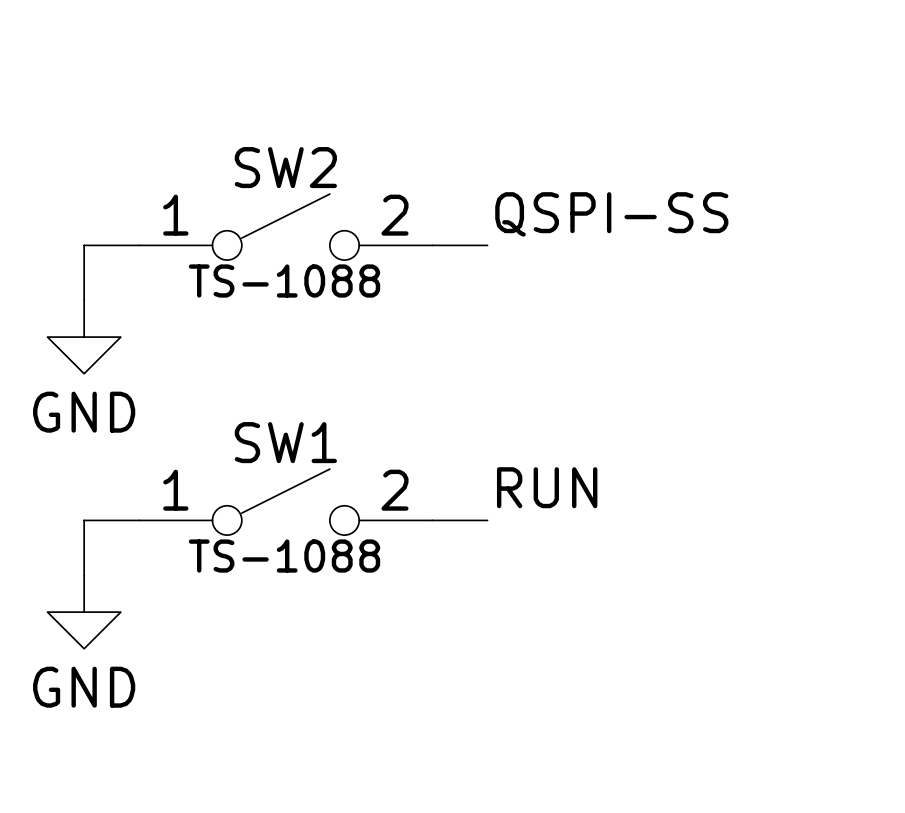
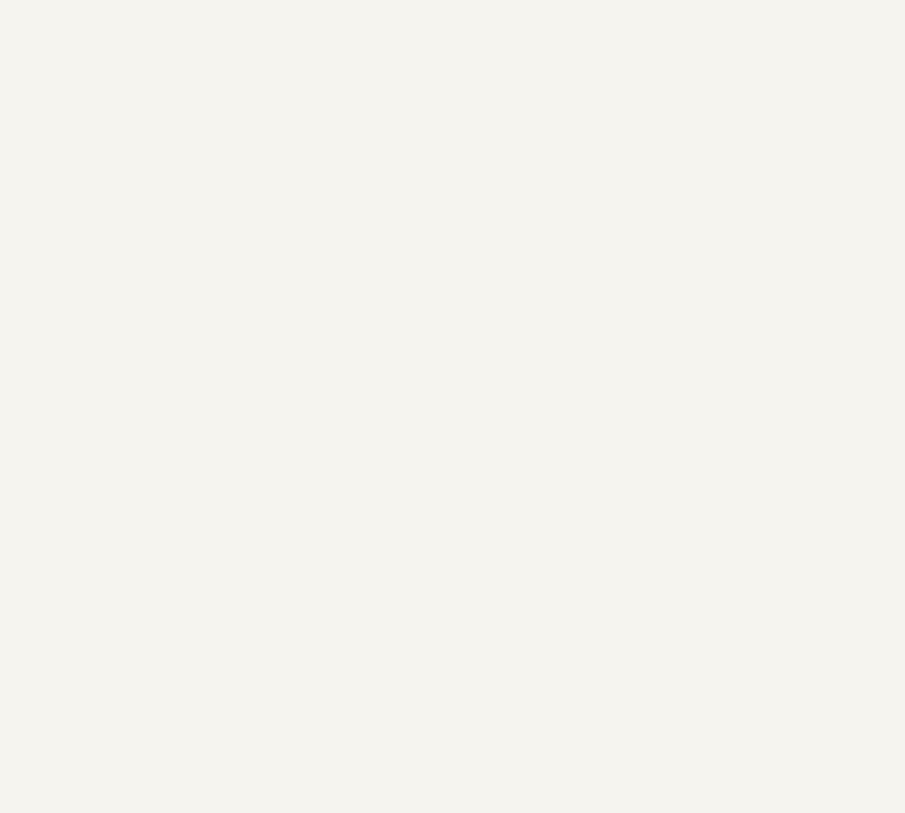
label: QSPI-SS (611, 214) -> none
SW2: TS-1088 (285, 227) -> none
wire: (139, 245) (84, 245) (84, 300) -> none
wire: (432, 245) (487, 245) -> none
power symbol: GND (84, 337) -> none
label: RUN (547, 487) -> none
SW1: TS-1088 (285, 502) -> none
wire: (139, 520) (84, 520) (84, 575) -> none
wire: (432, 520) (487, 520) -> none
power symbol: GND (84, 612) -> none

